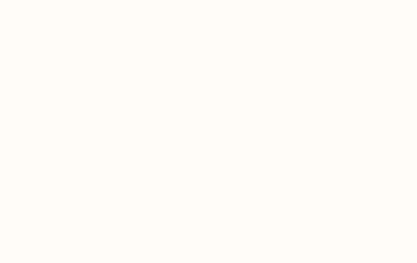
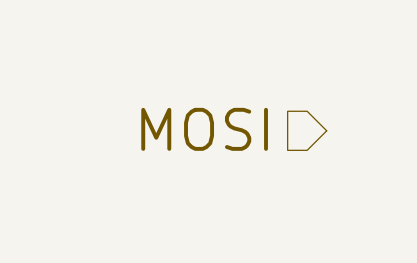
hierarchical label: none -> MOSI (204, 129)

